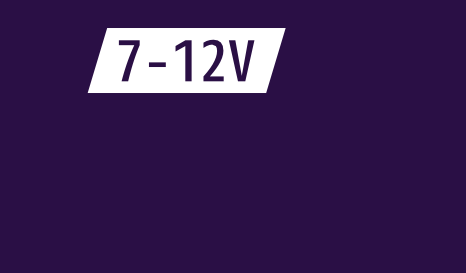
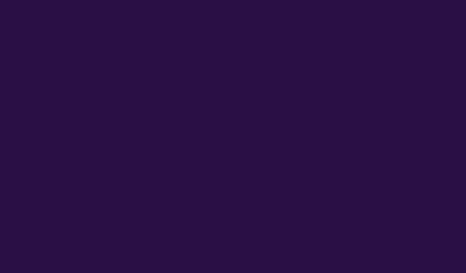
drawing: [87, 28, 286, 94] -> none

